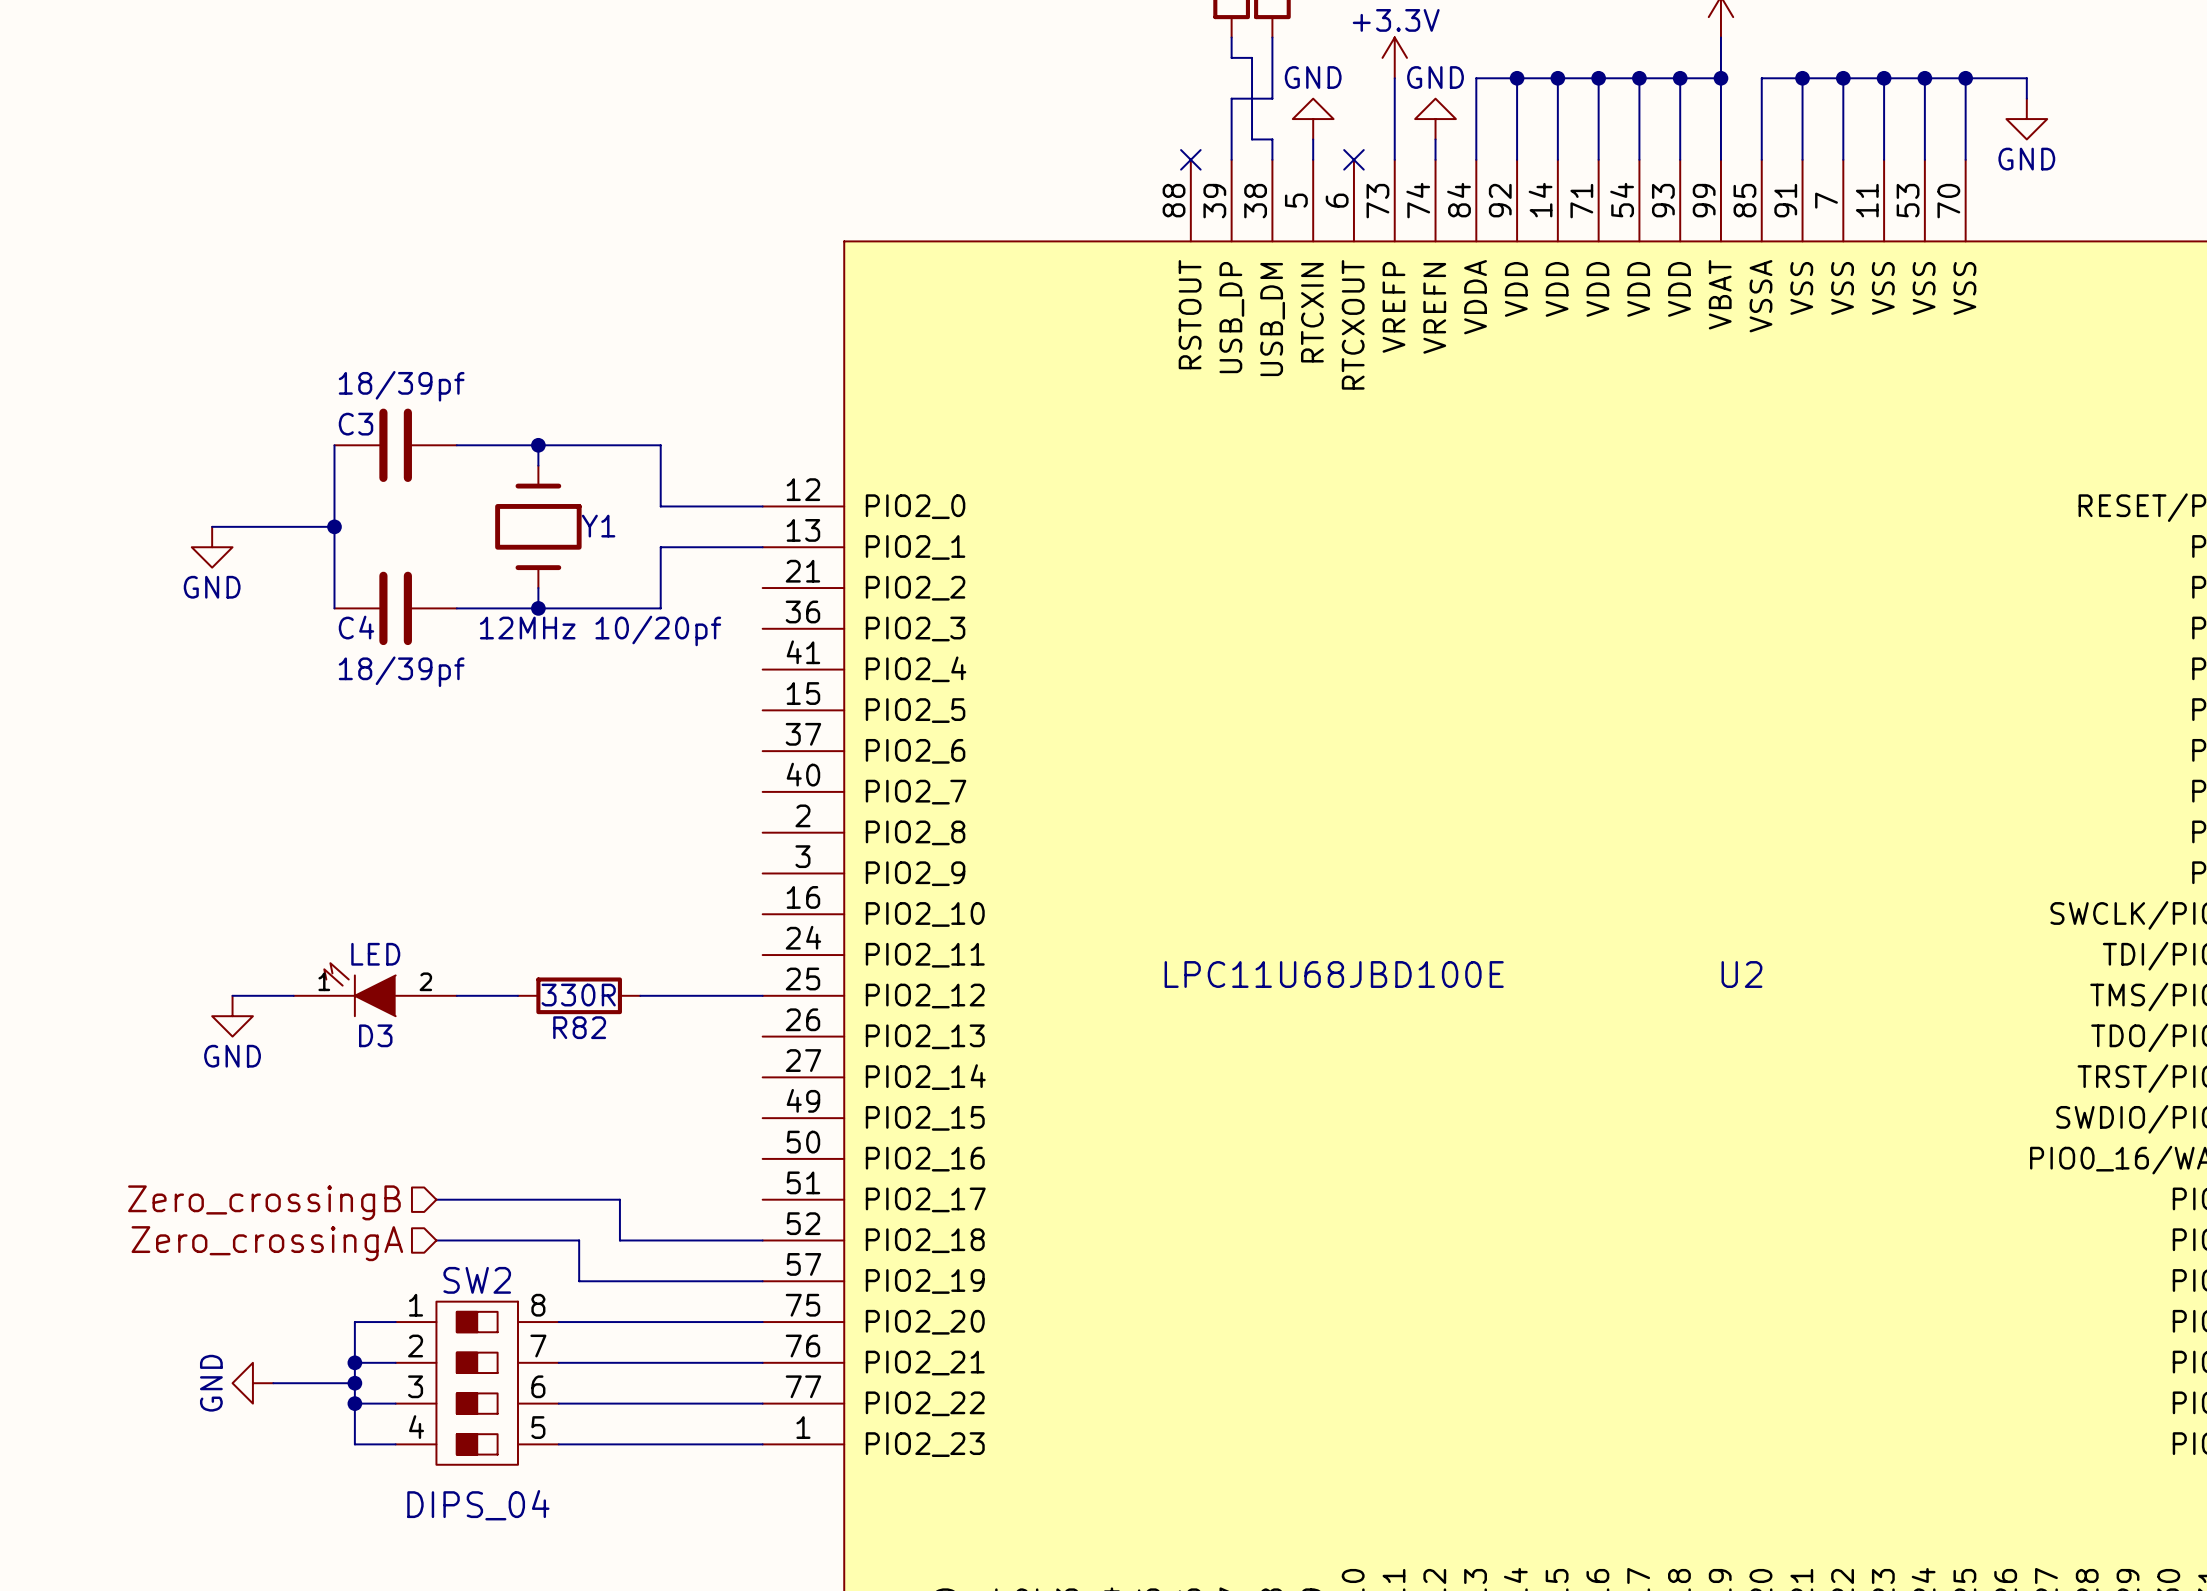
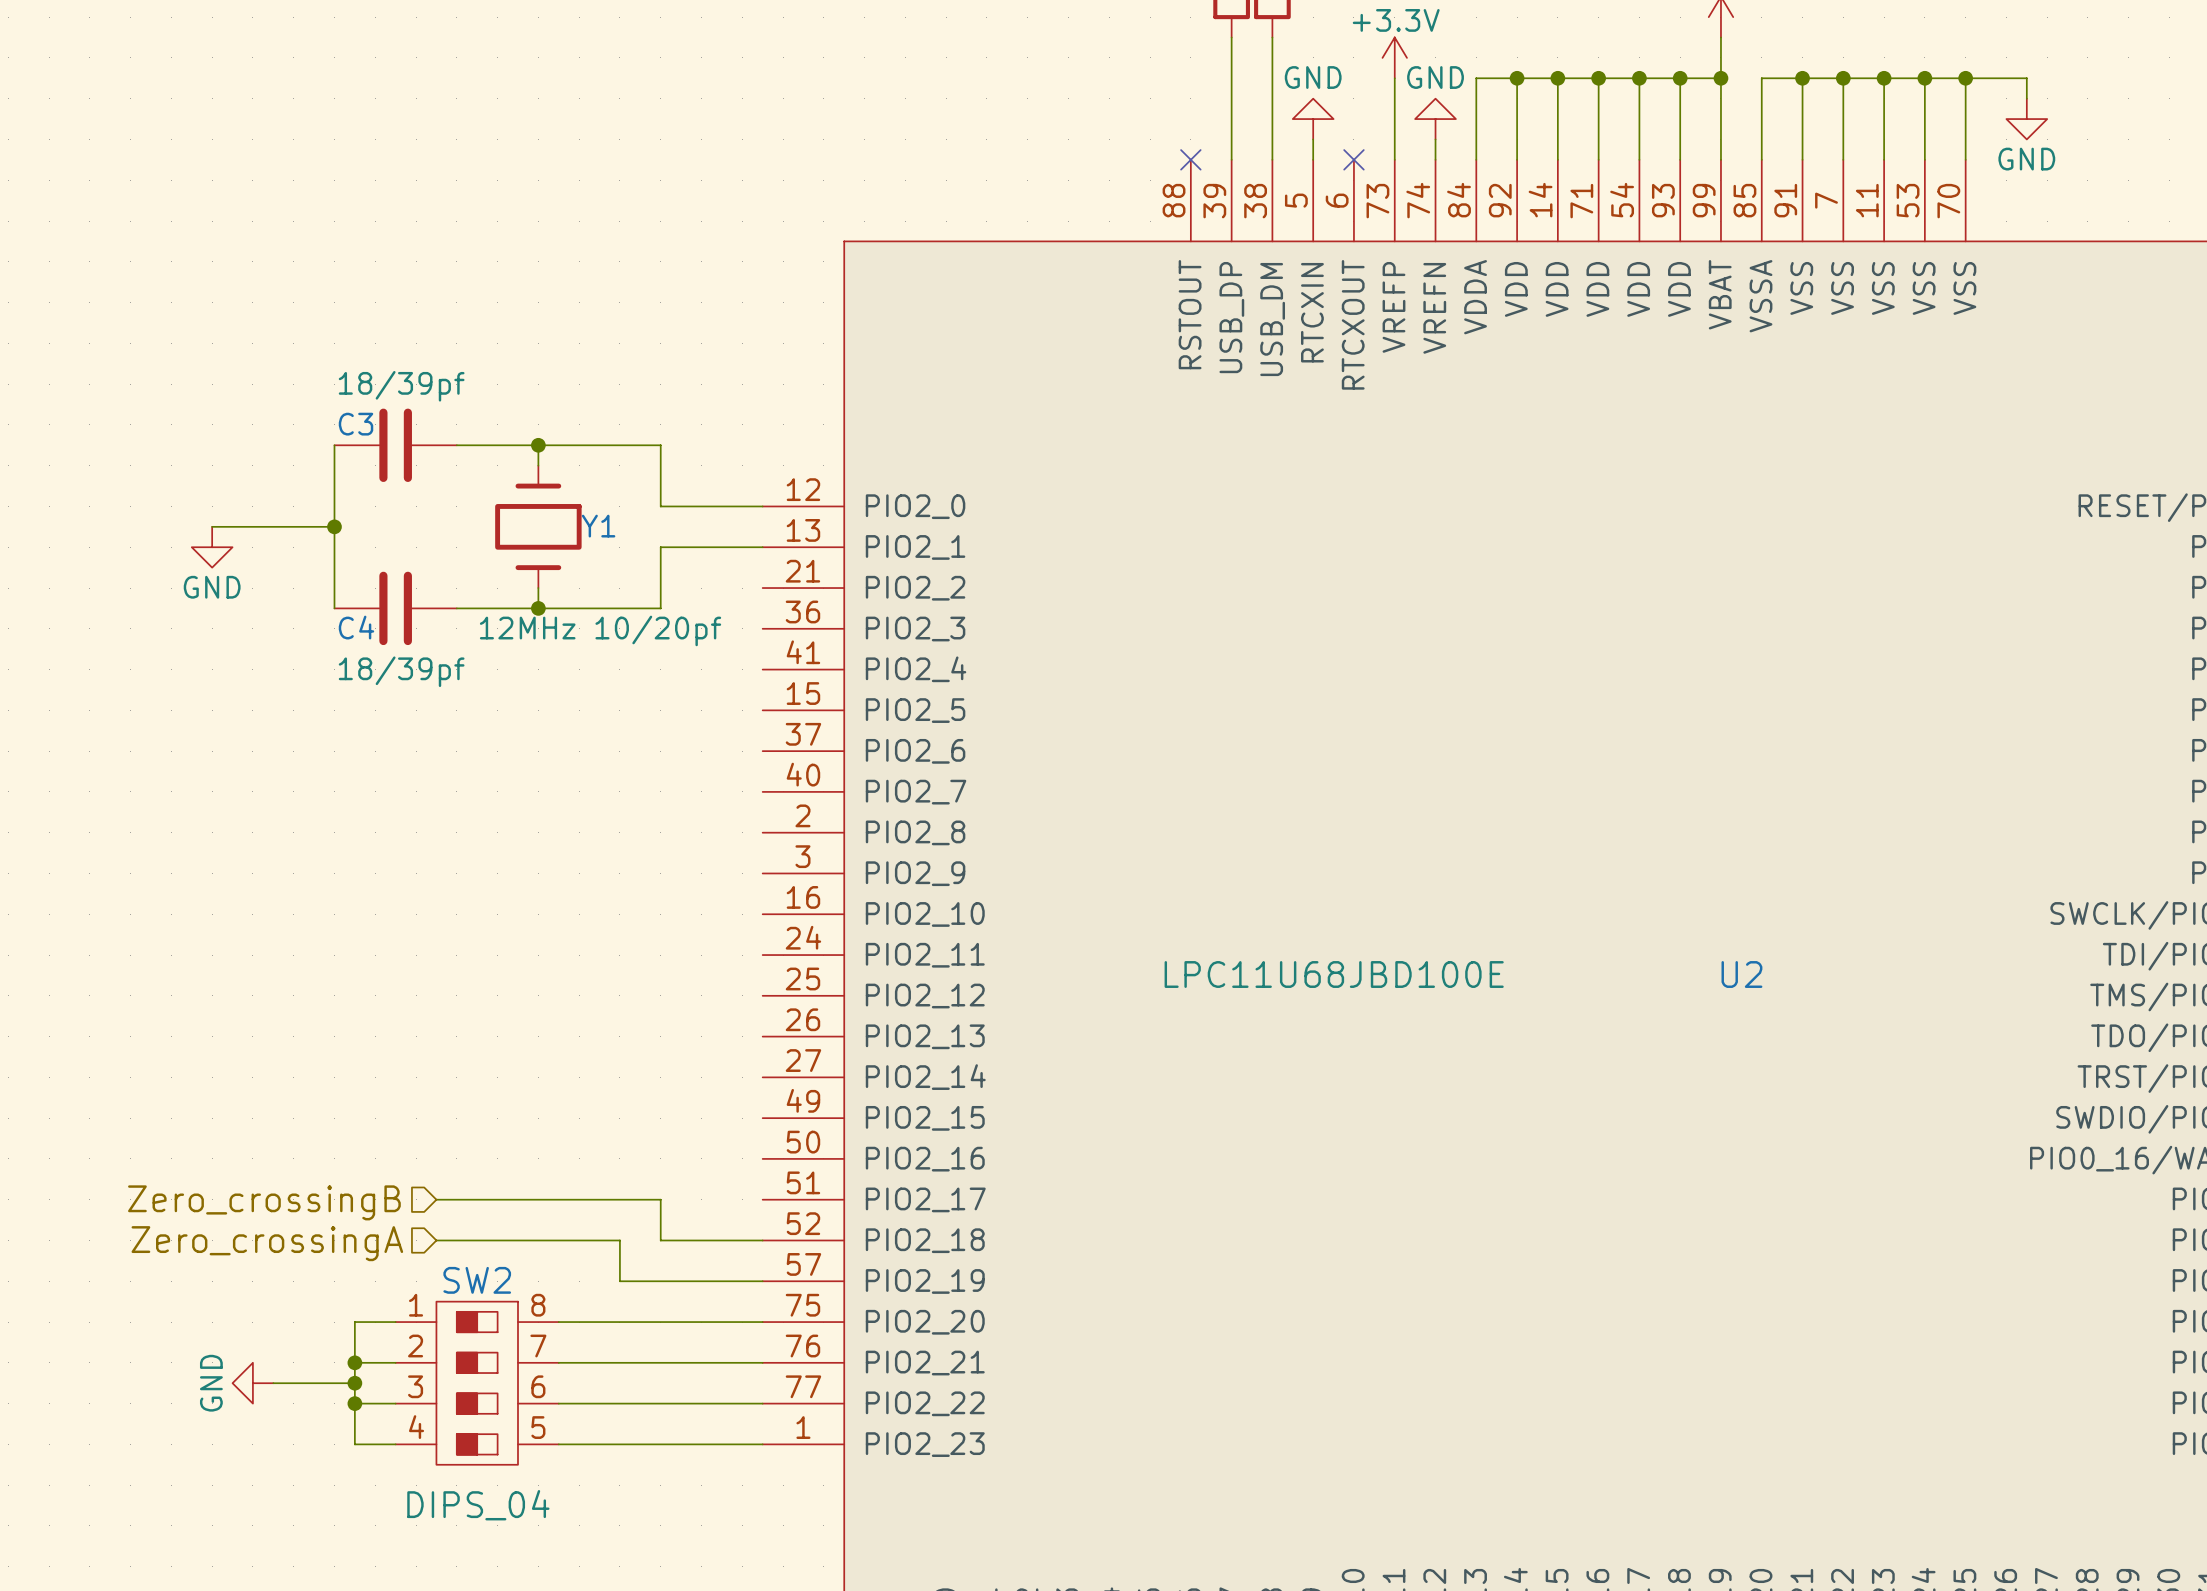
wire: (1231, 57) (1252, 57) (1252, 139) (1272, 139) -> (1231, 57) (1231, 98)
wire: (1231, 98) (1272, 98) -> (1272, 139) (1272, 98)
D3: LED (375, 989) -> none
wire: (232, 995) (293, 995) -> none
wire: (456, 995) (517, 995) -> none
R82: 330R (579, 995) -> none
wire: (640, 995) (762, 995) -> none
power symbol: GND (232, 1016) -> none
wire: (619, 1199) (619, 1240) (660, 1240) -> (619, 1199) (660, 1199) (660, 1240)
wire: (579, 1240) (579, 1281) (619, 1281) -> (579, 1240) (619, 1240) (619, 1281)

